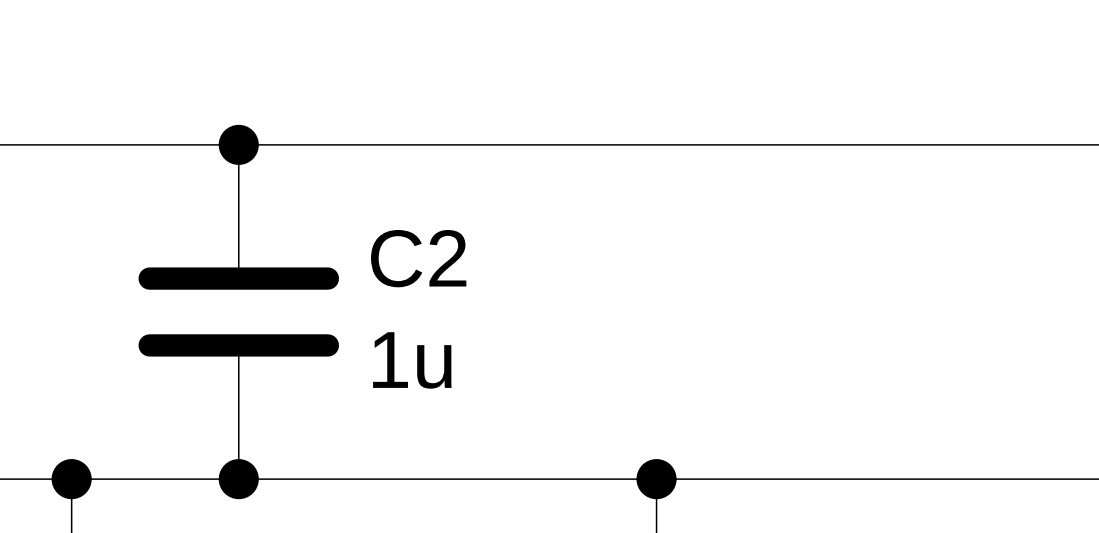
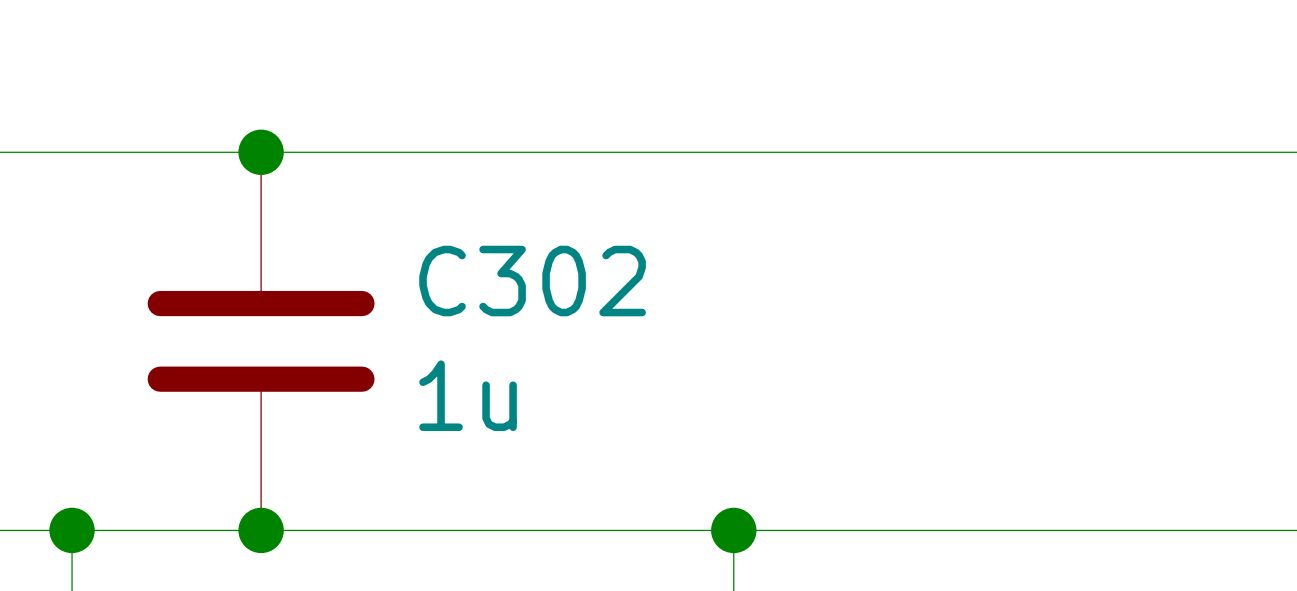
C2 name: C2 (418, 258) -> C302 (532, 281)

